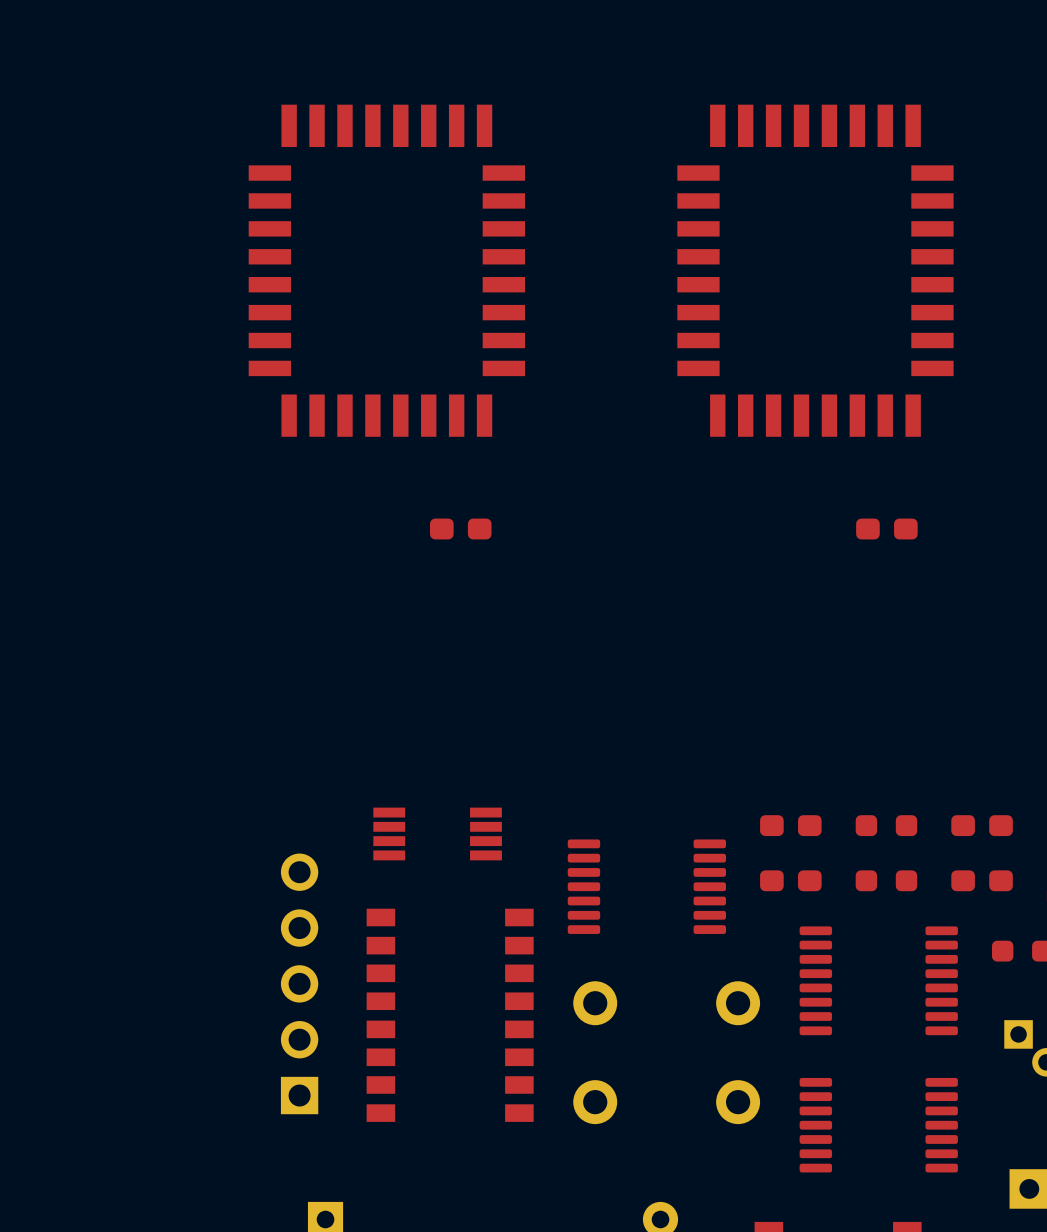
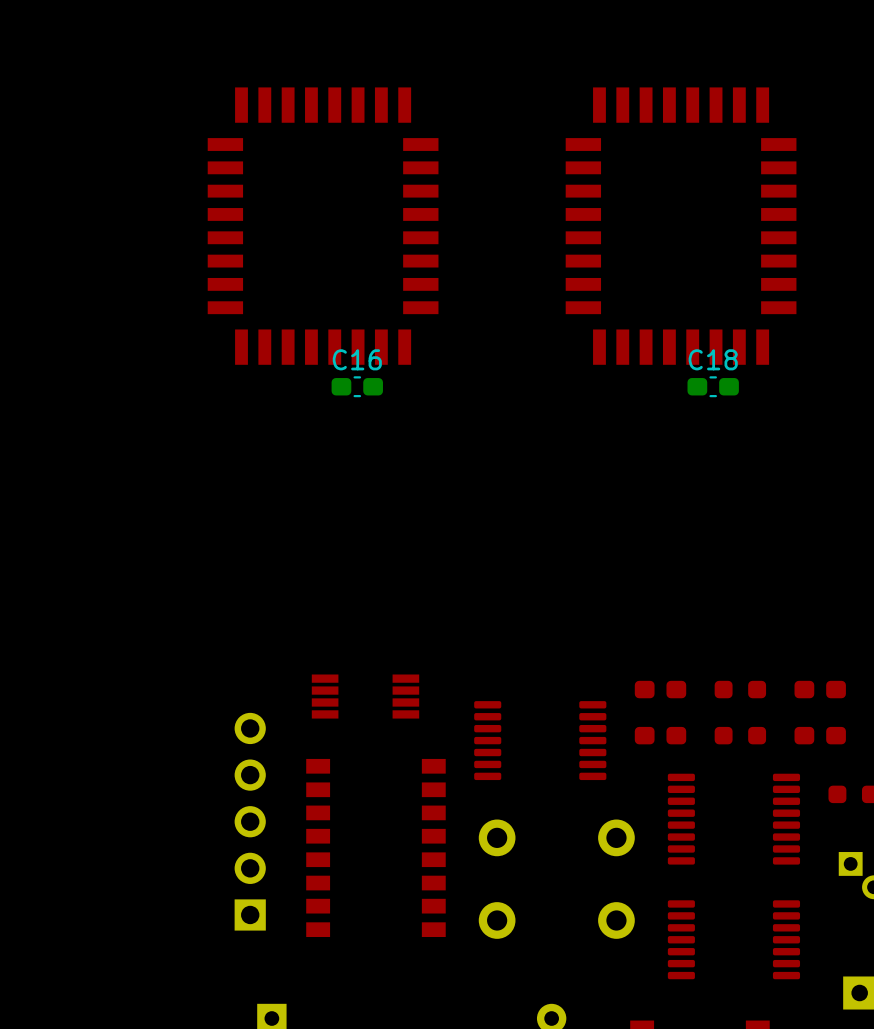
C16 side: top (460, 529) -> bottom (357, 386)
C18 side: top (886, 529) -> bottom (713, 386)

